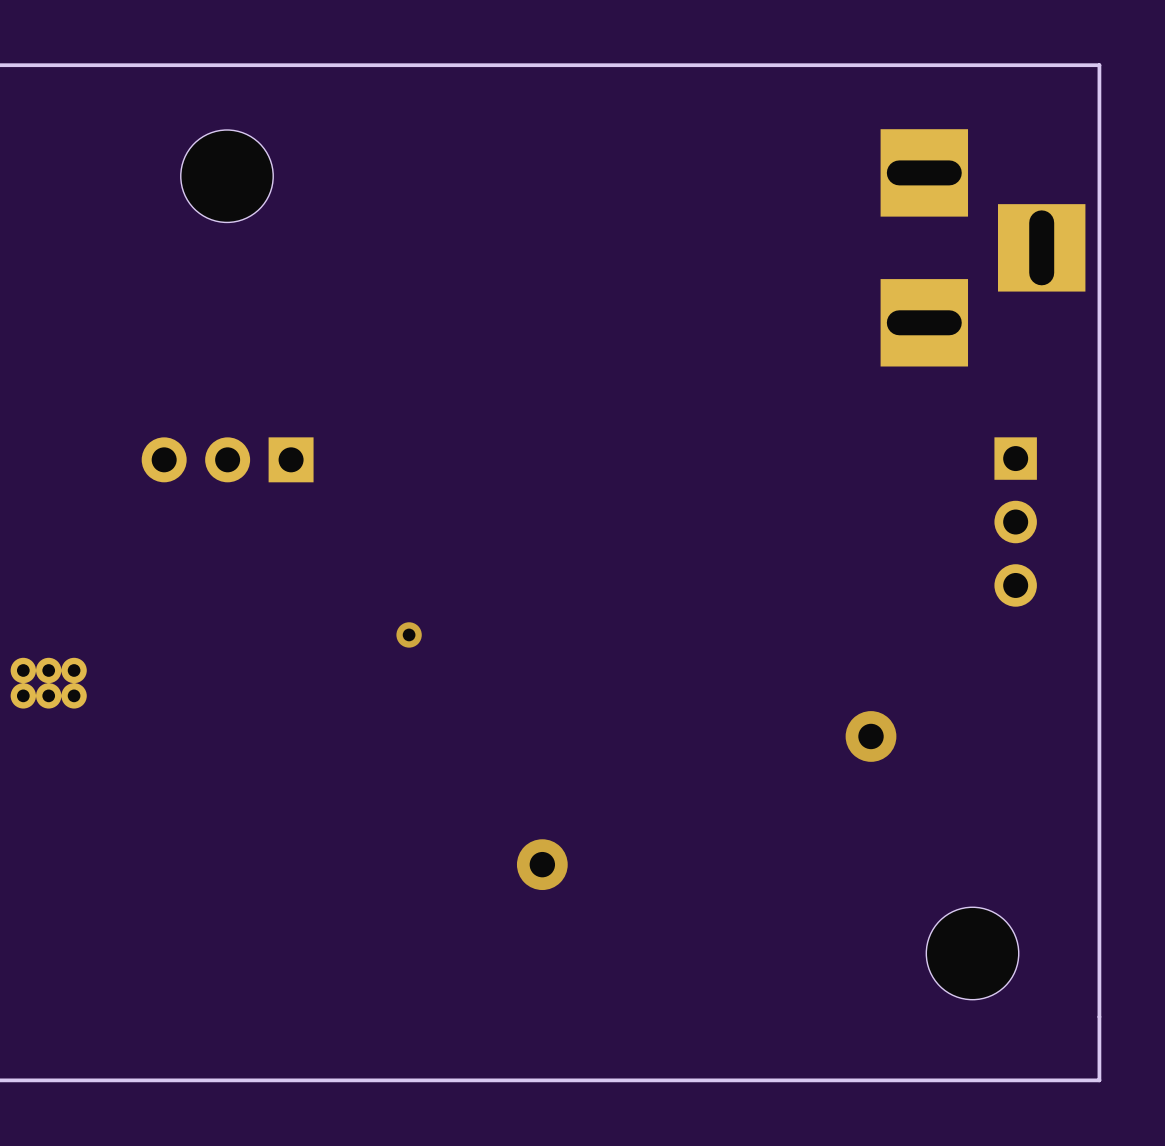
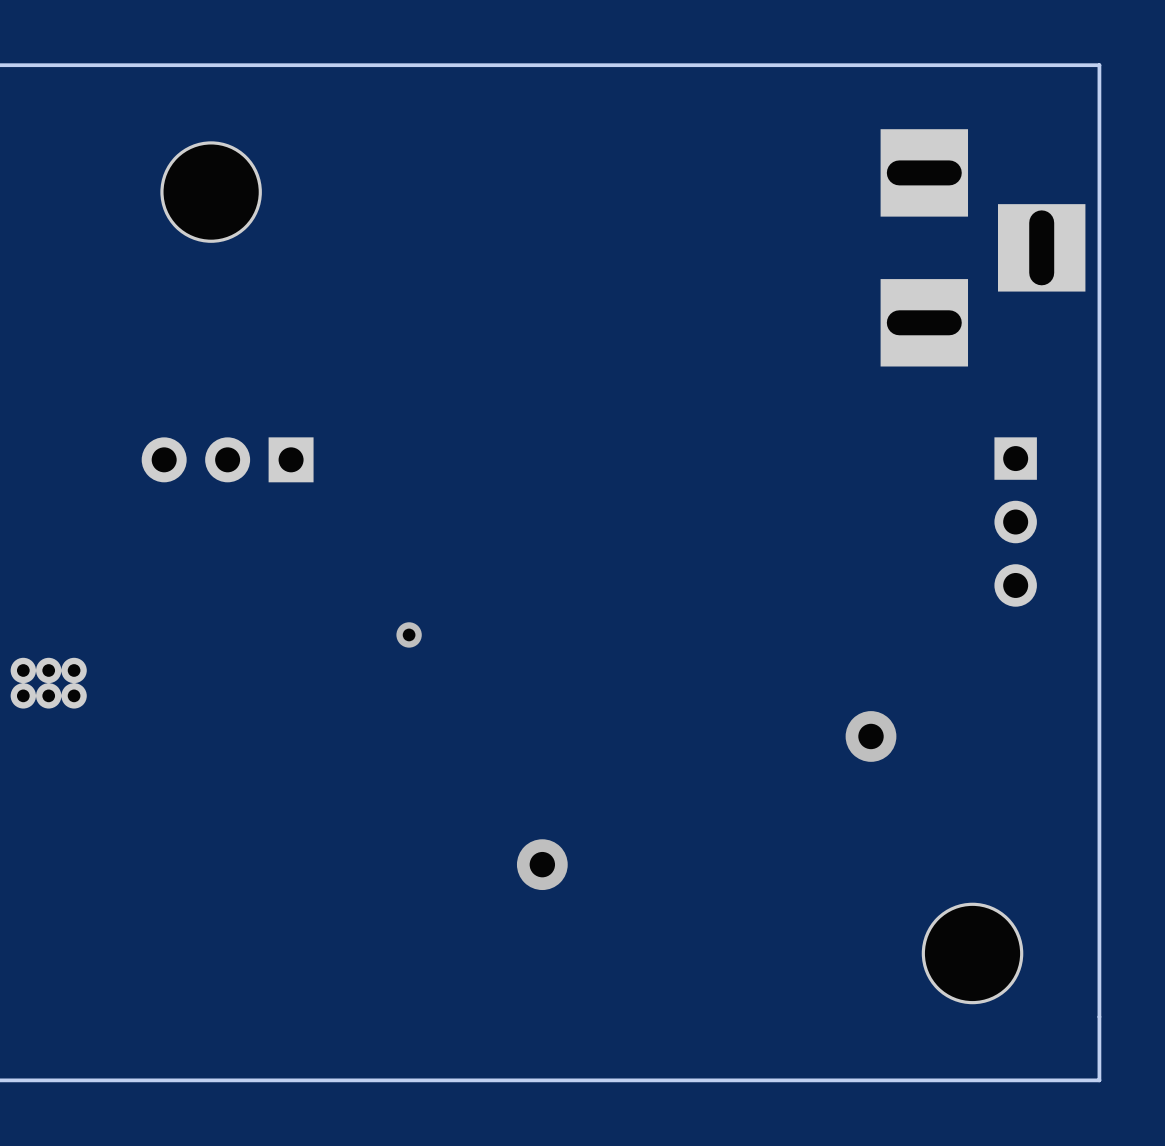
part footprint: [180, 130, 274, 223] -> [160, 141, 262, 243]
part footprint: [926, 907, 1019, 1000] -> [921, 902, 1024, 1005]

